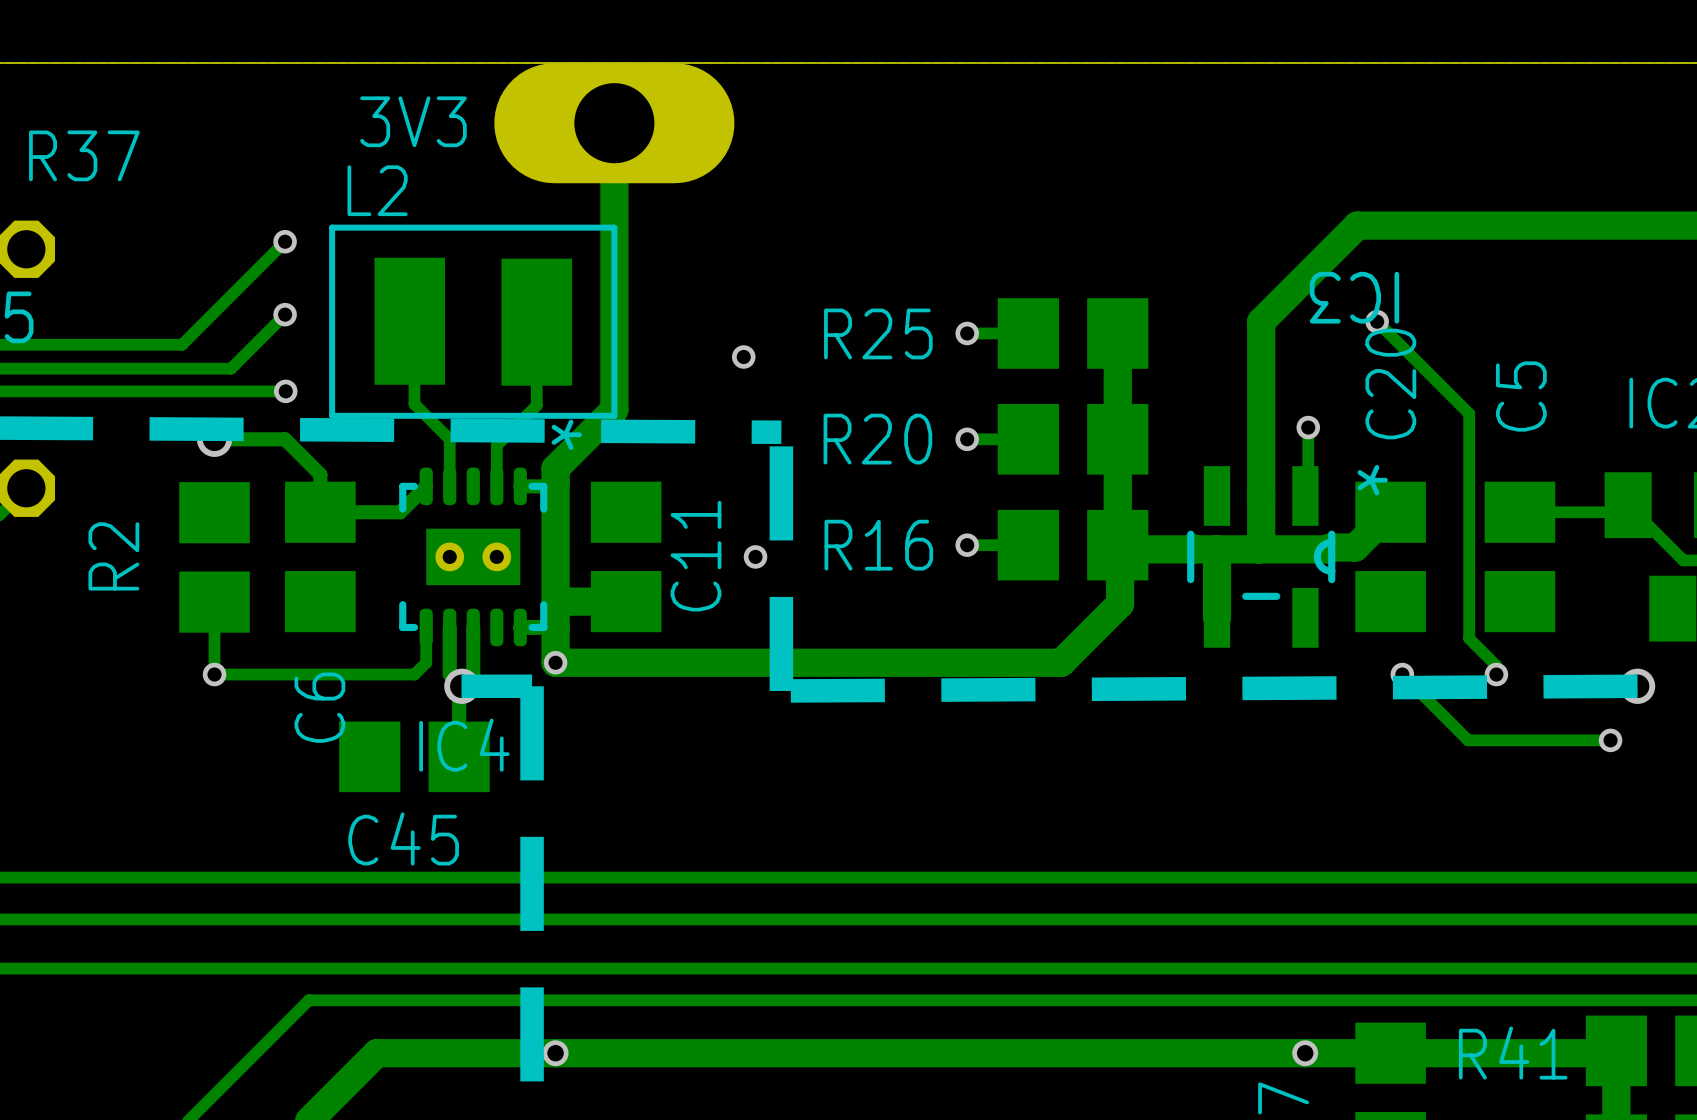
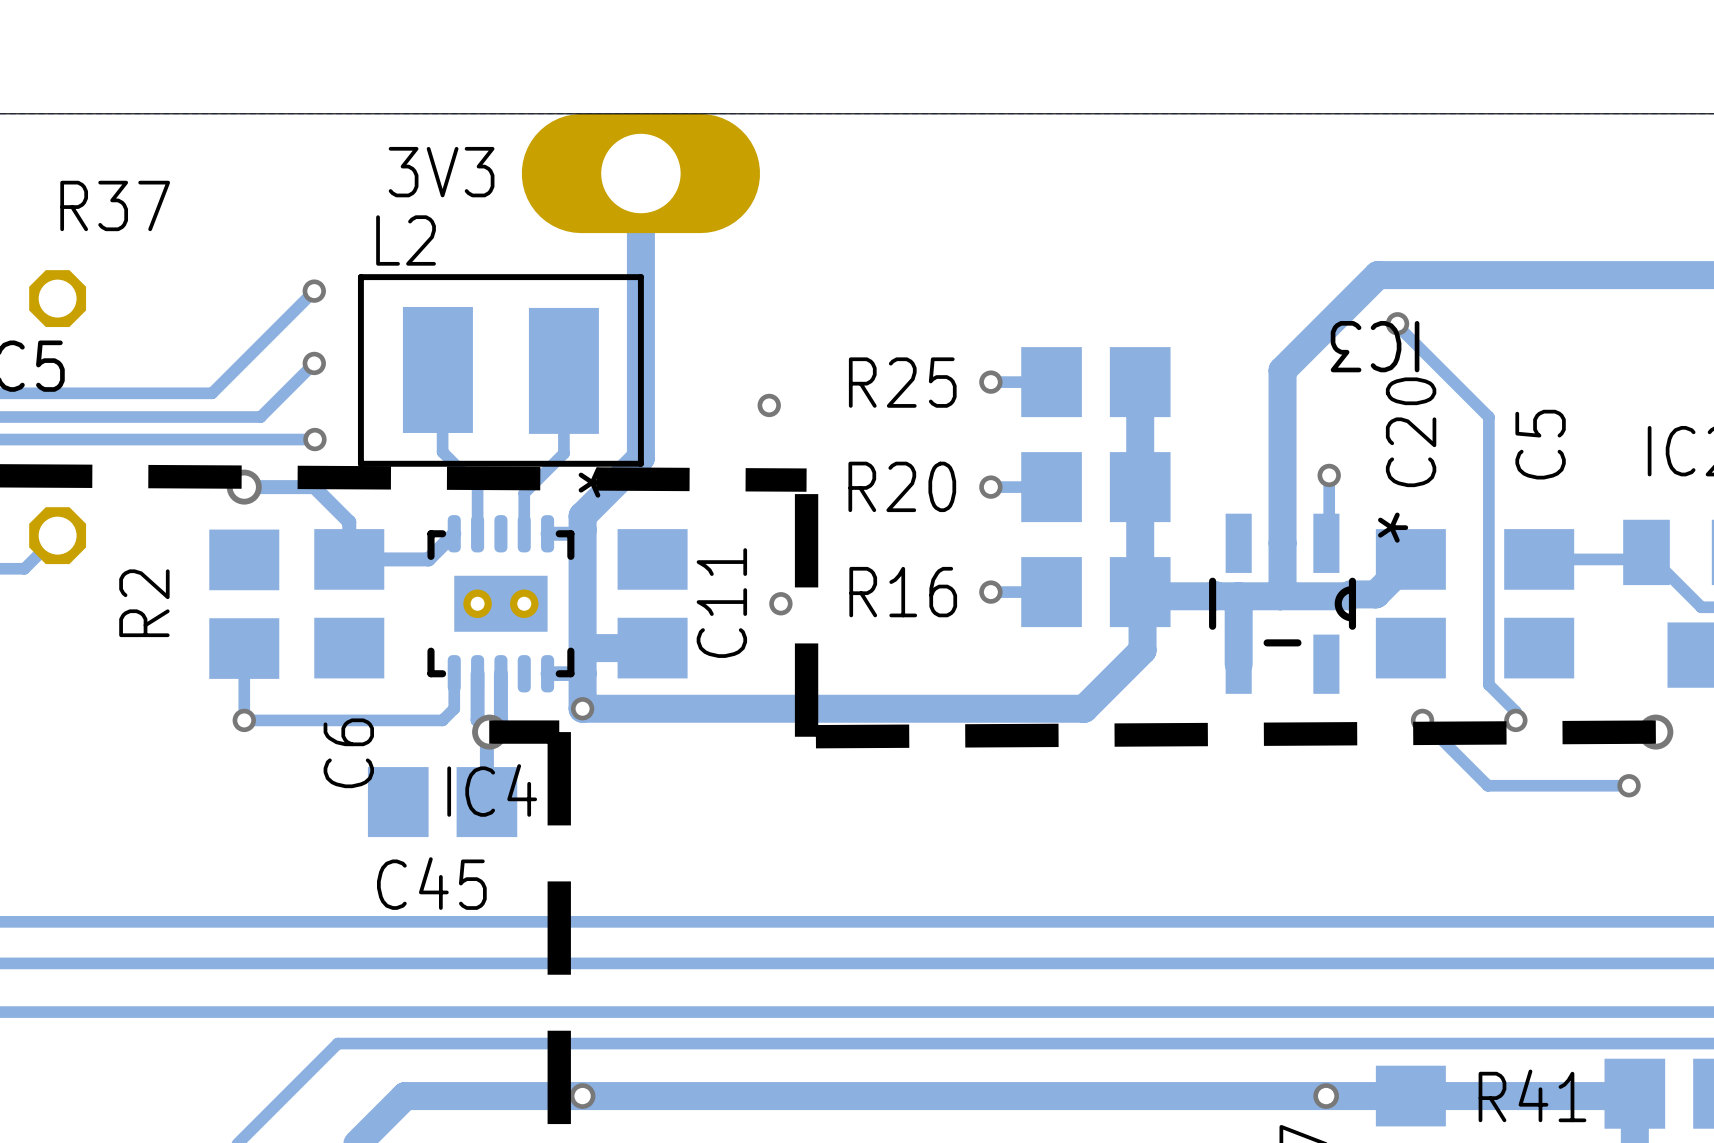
track: (1377, 321) (1469, 413) -> (1397, 323) (1488, 417) (1488, 461)
via position: (1377, 321) -> (1397, 323)

